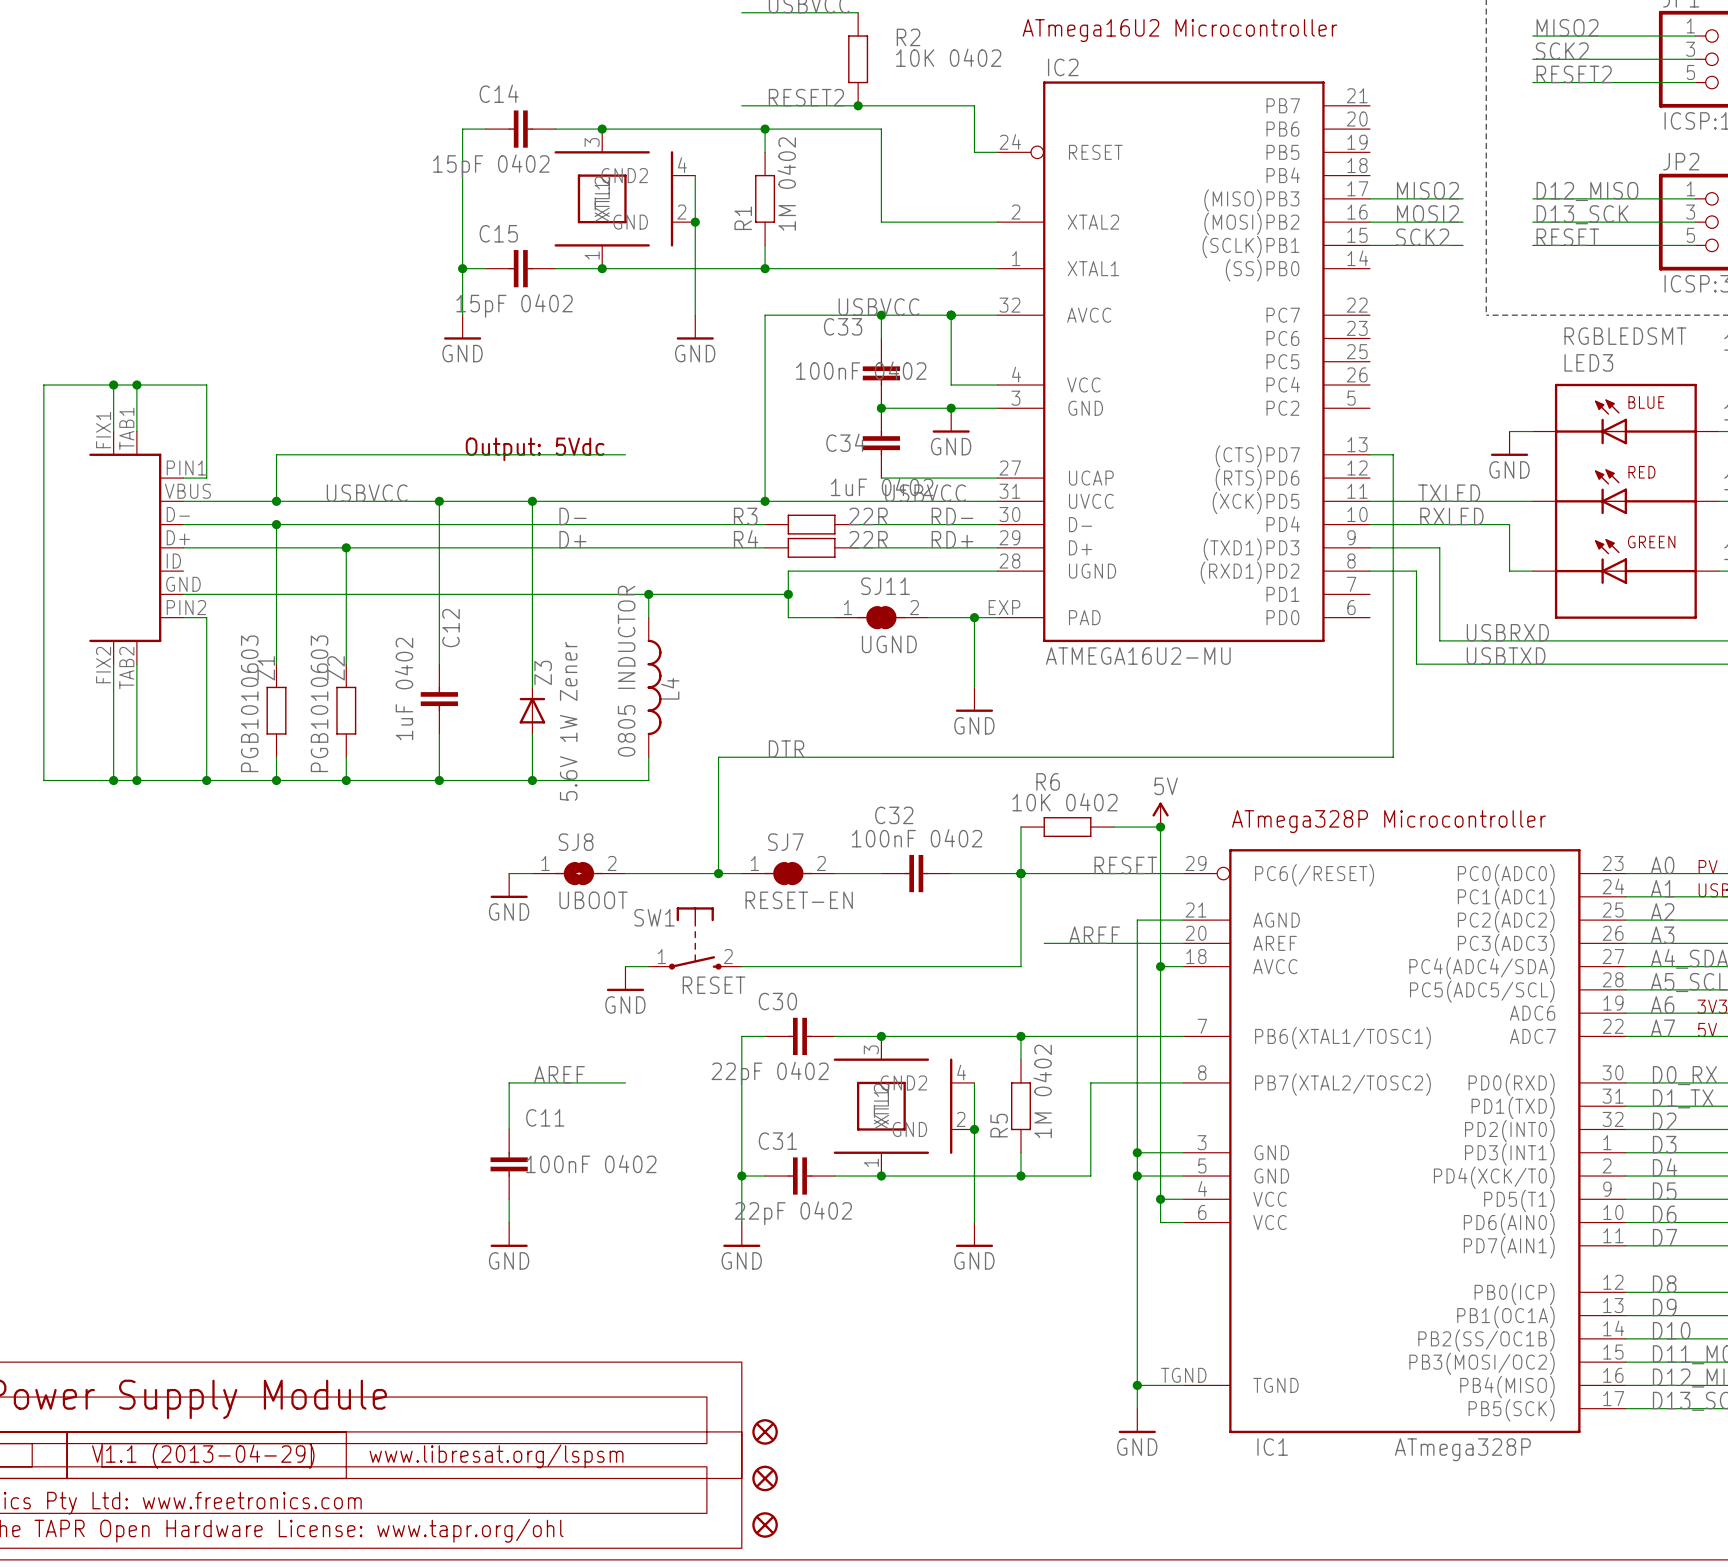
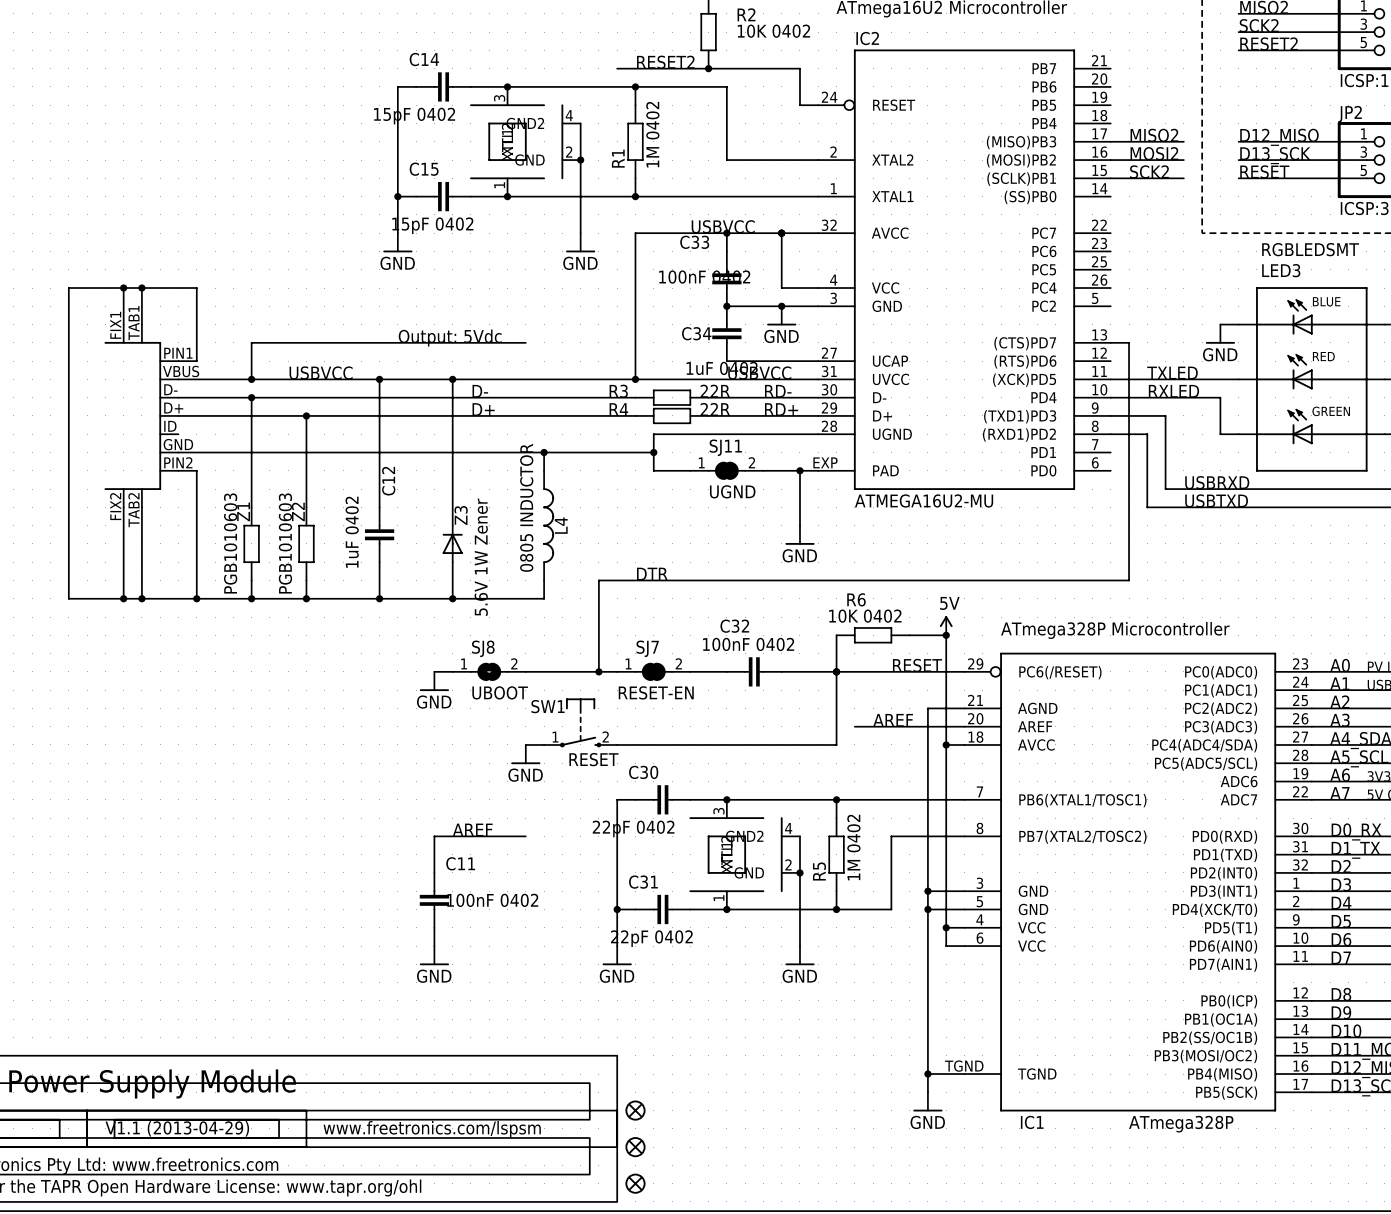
text: www.libresat.org/lspsm (496, 1456) -> www.freetronics.com/lspsm (432, 1129)

